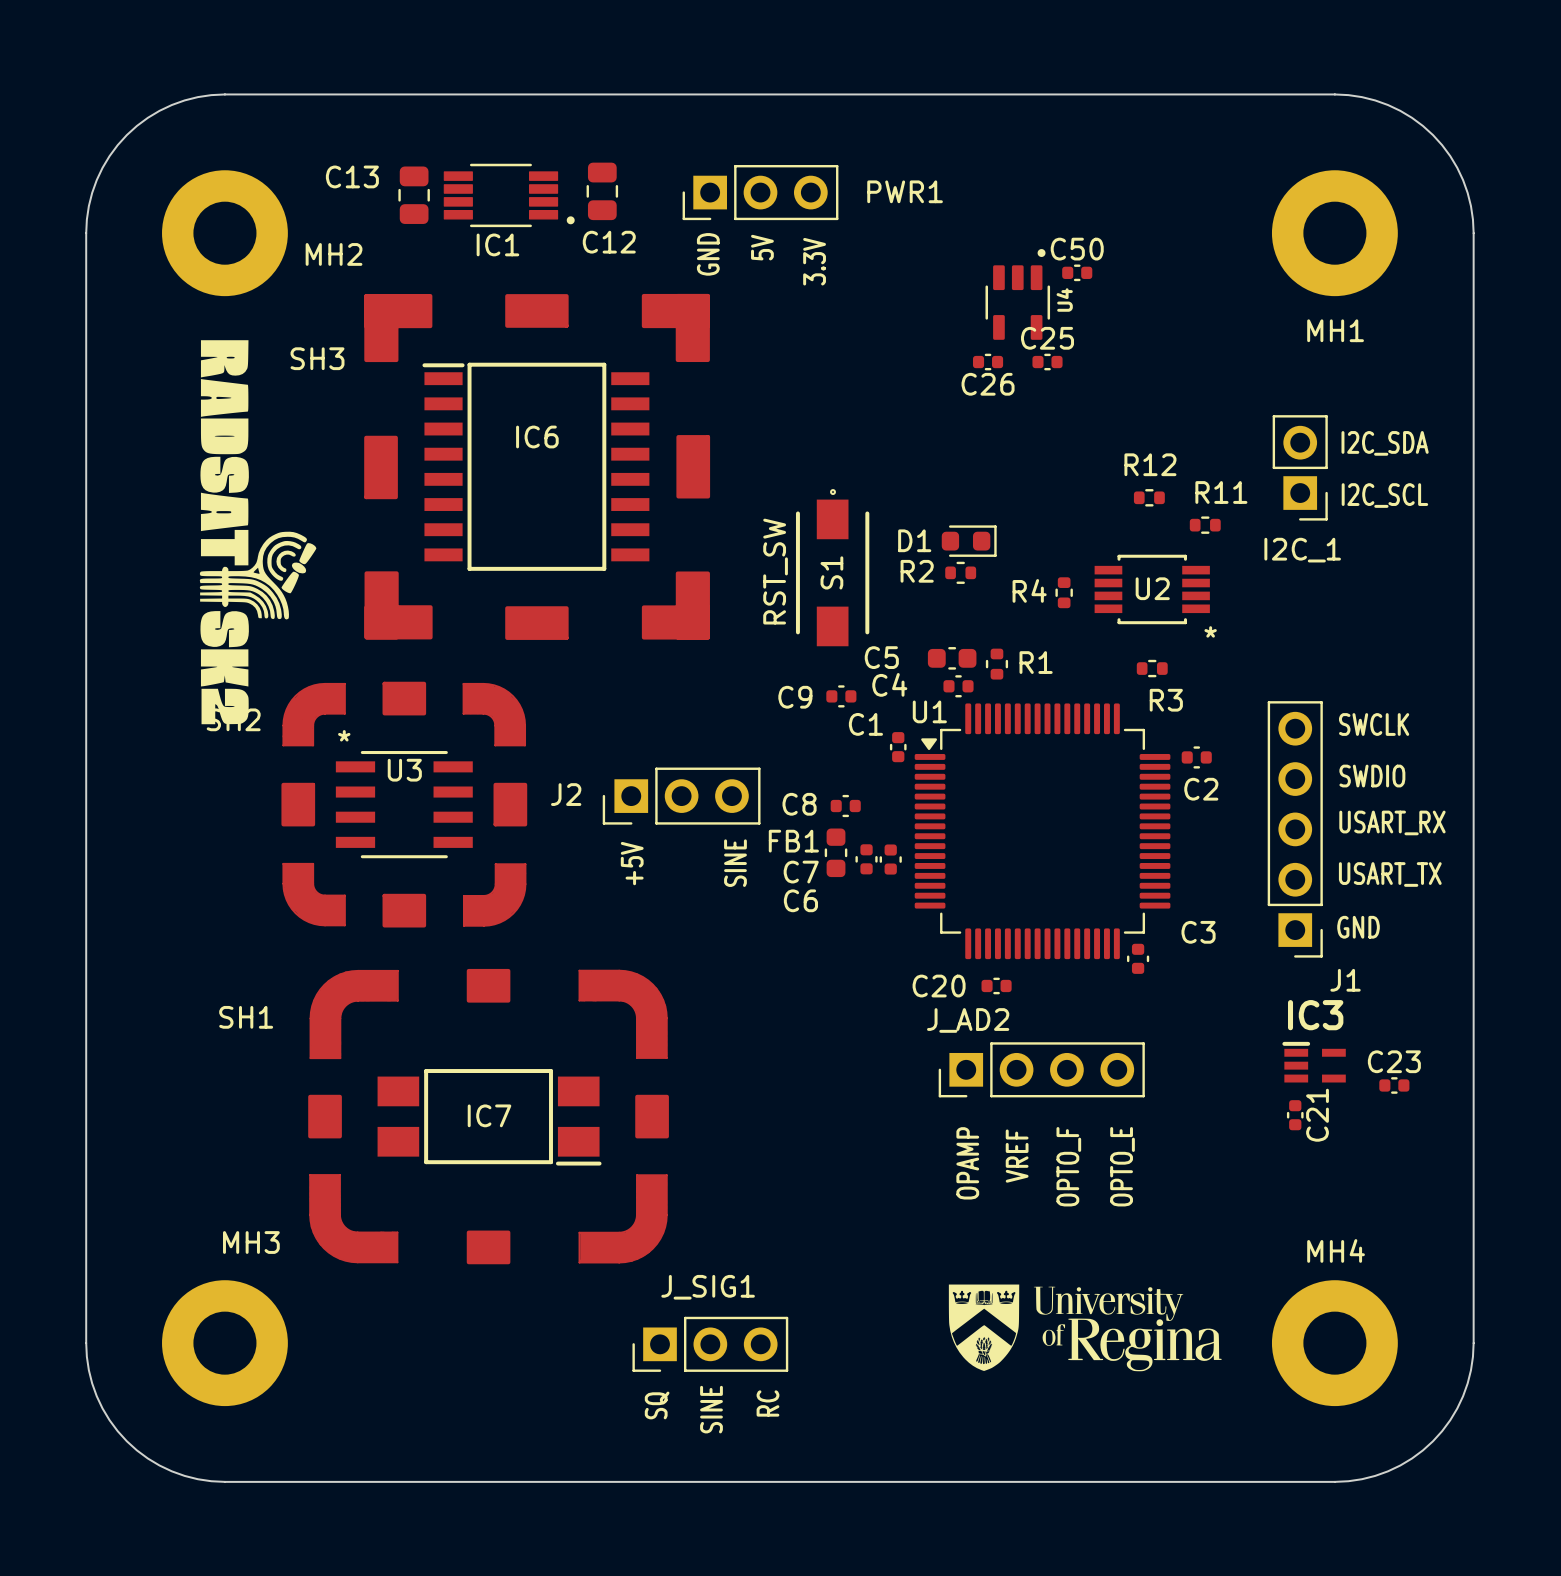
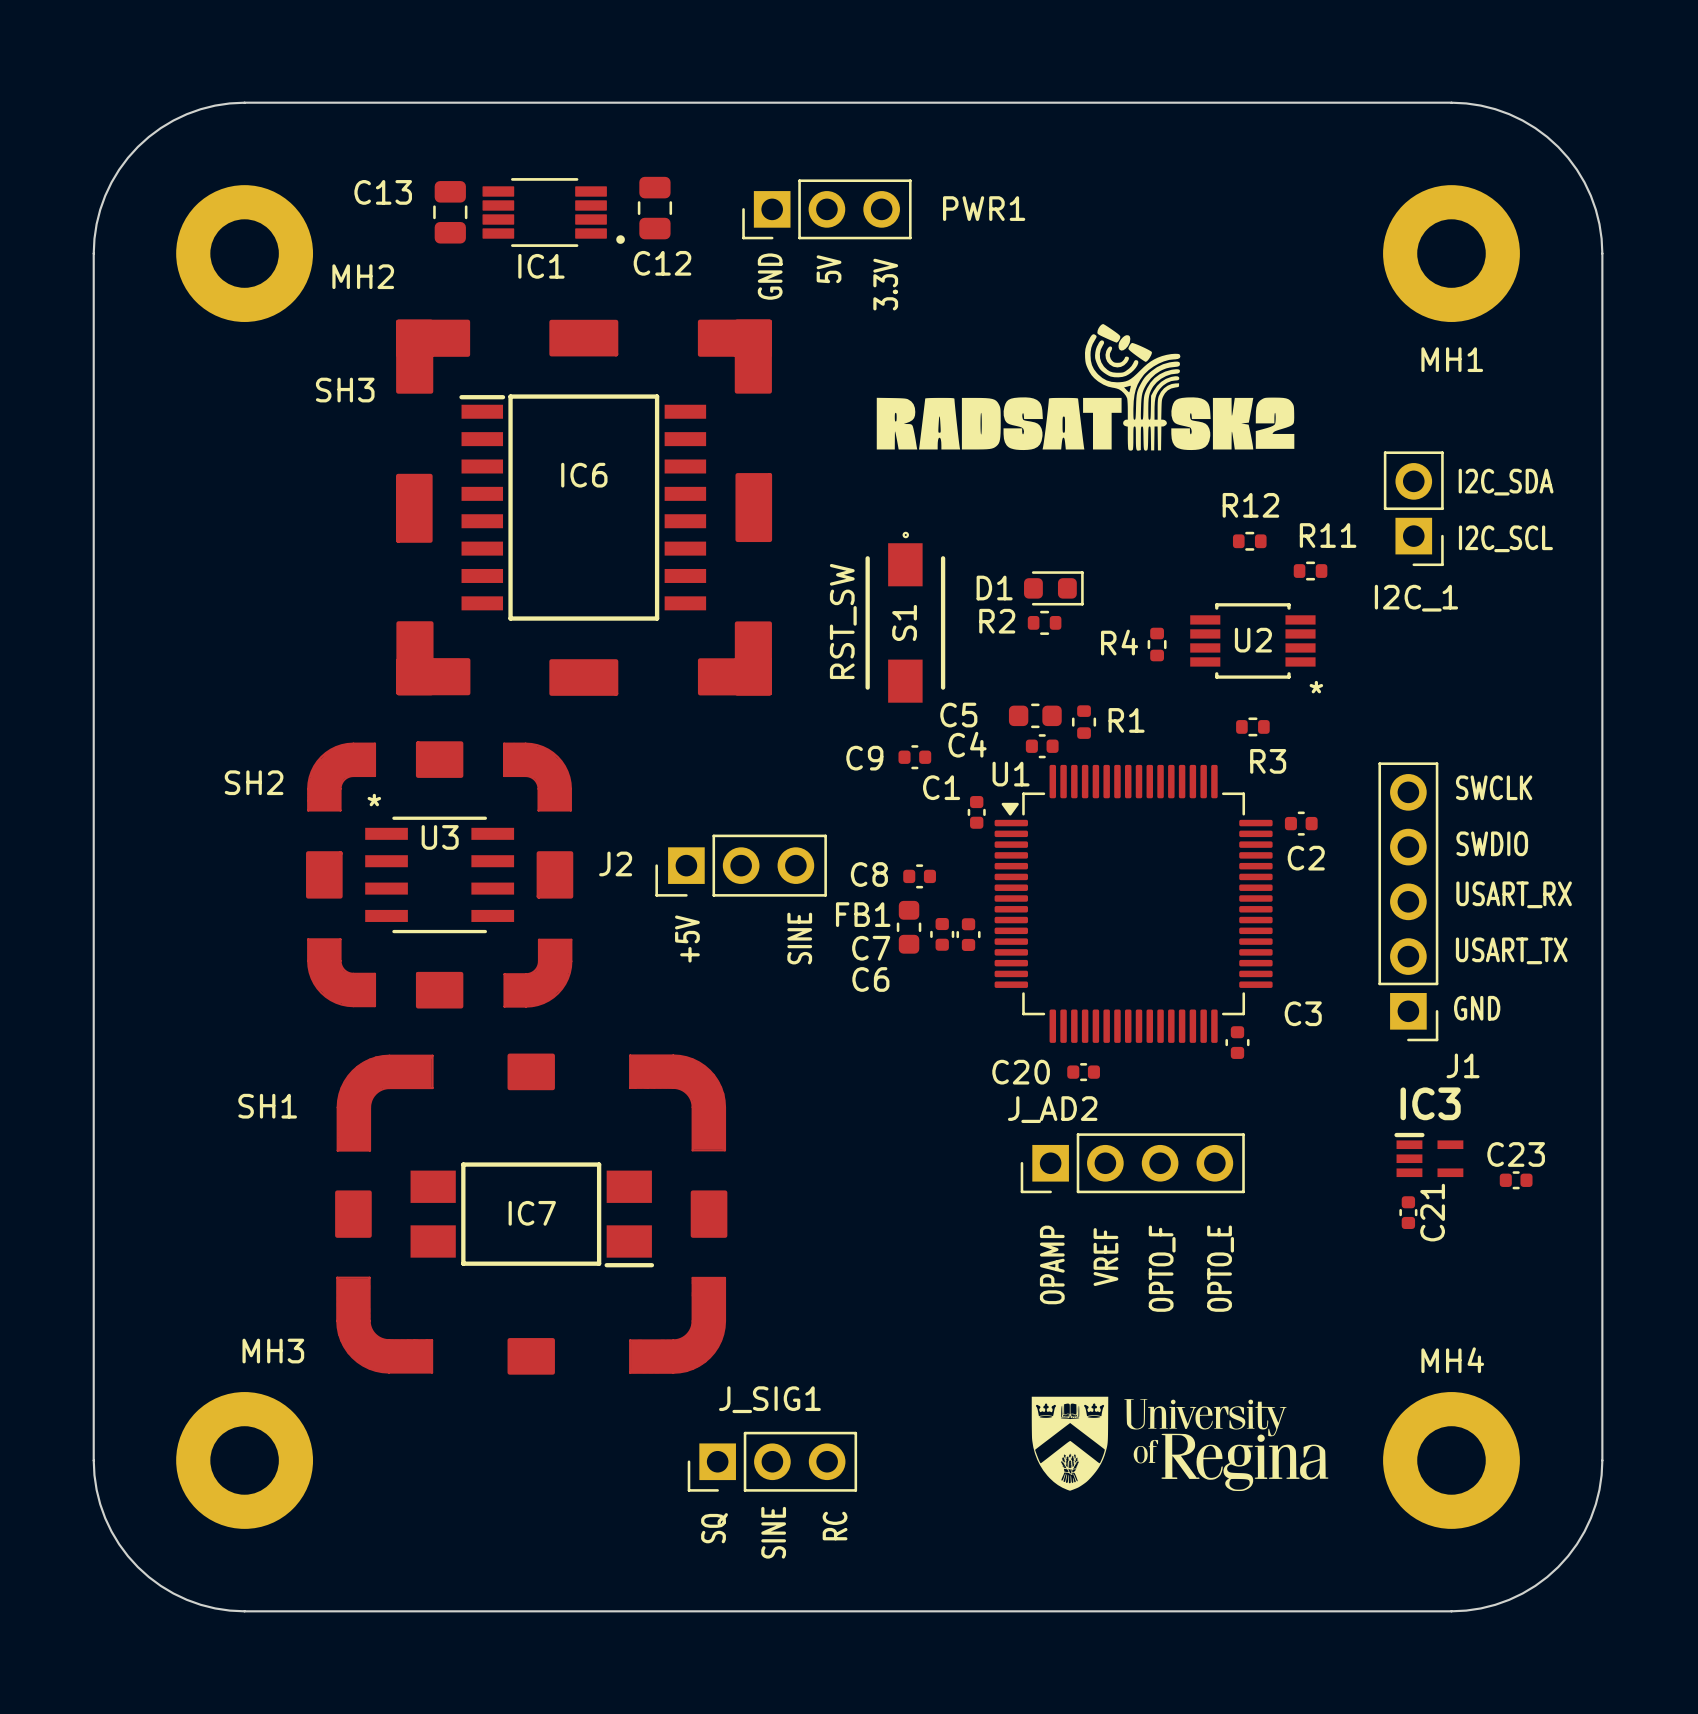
C50: (1077, 272) -> none
U4: (1017, 294) -> none
drawing: none -> [876, 324, 1295, 451]
drawing: [199, 340, 317, 725] -> none
C26: (988, 362) -> none
C25: (1047, 362) -> none

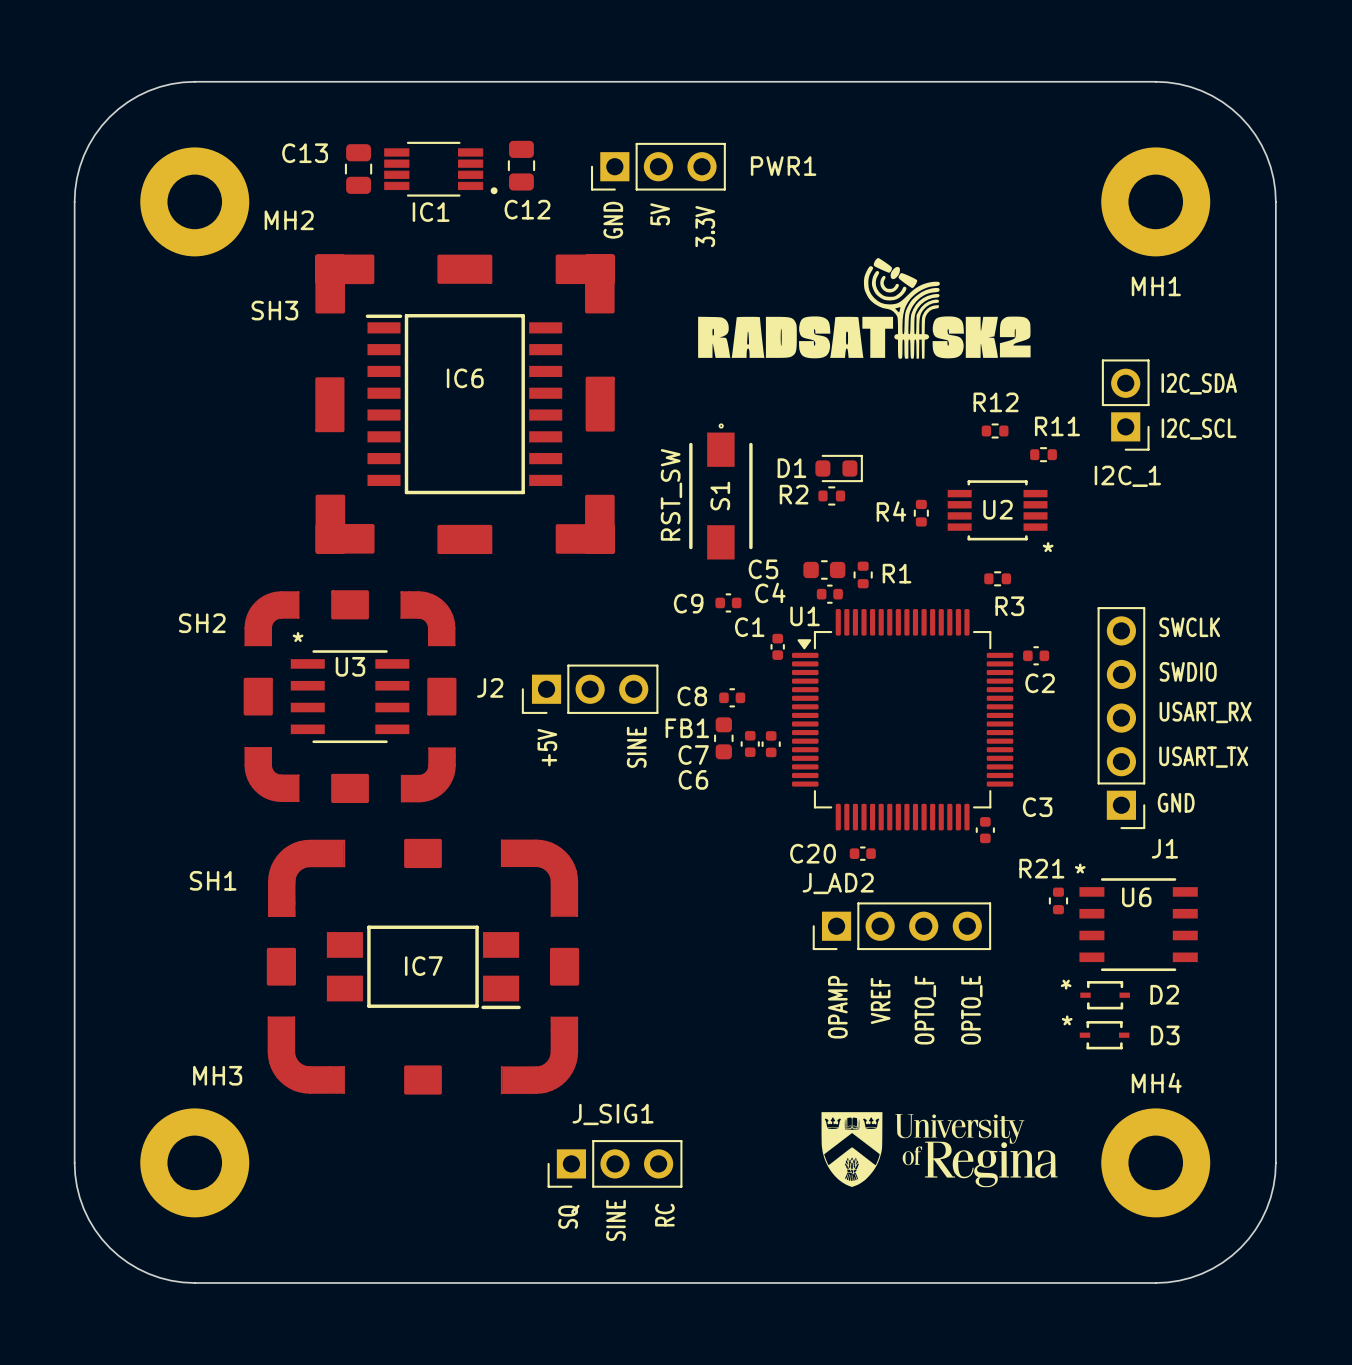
R21: none -> (1058, 900)
IC3: (1428, 1154) -> none
U6: none -> (1138, 924)
C23: (1516, 1180) -> none
C21: (1408, 1212) -> none
D2: none -> (1105, 995)
D3: none -> (1104, 1035)

